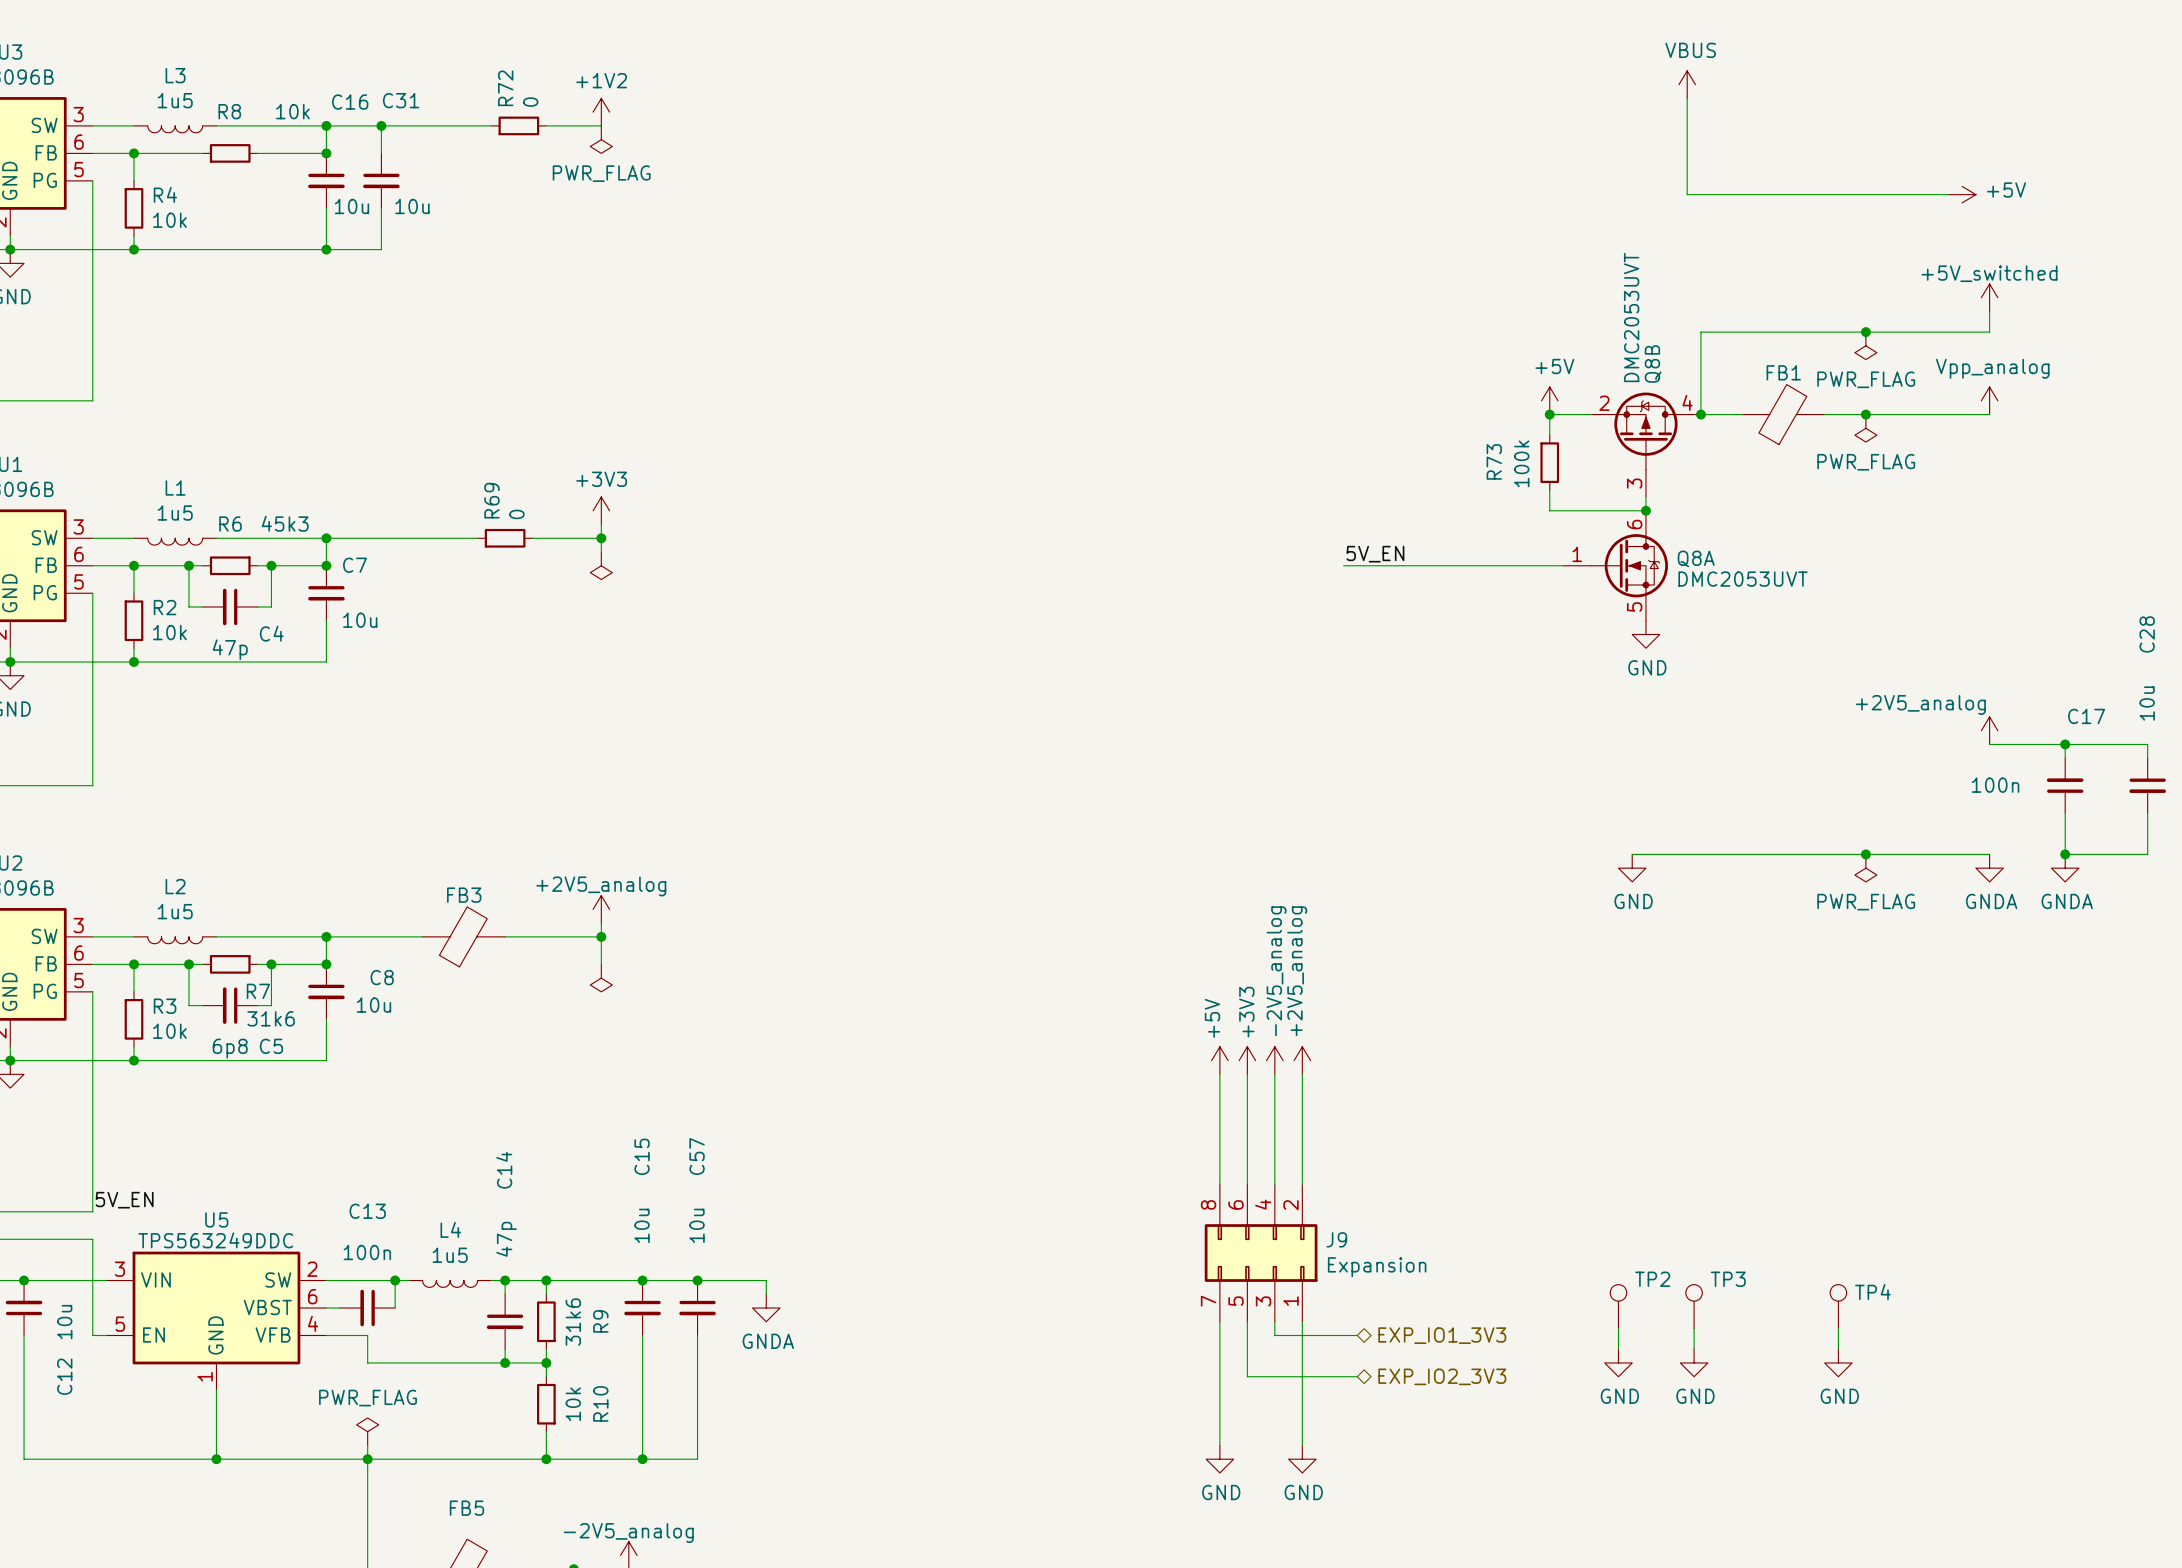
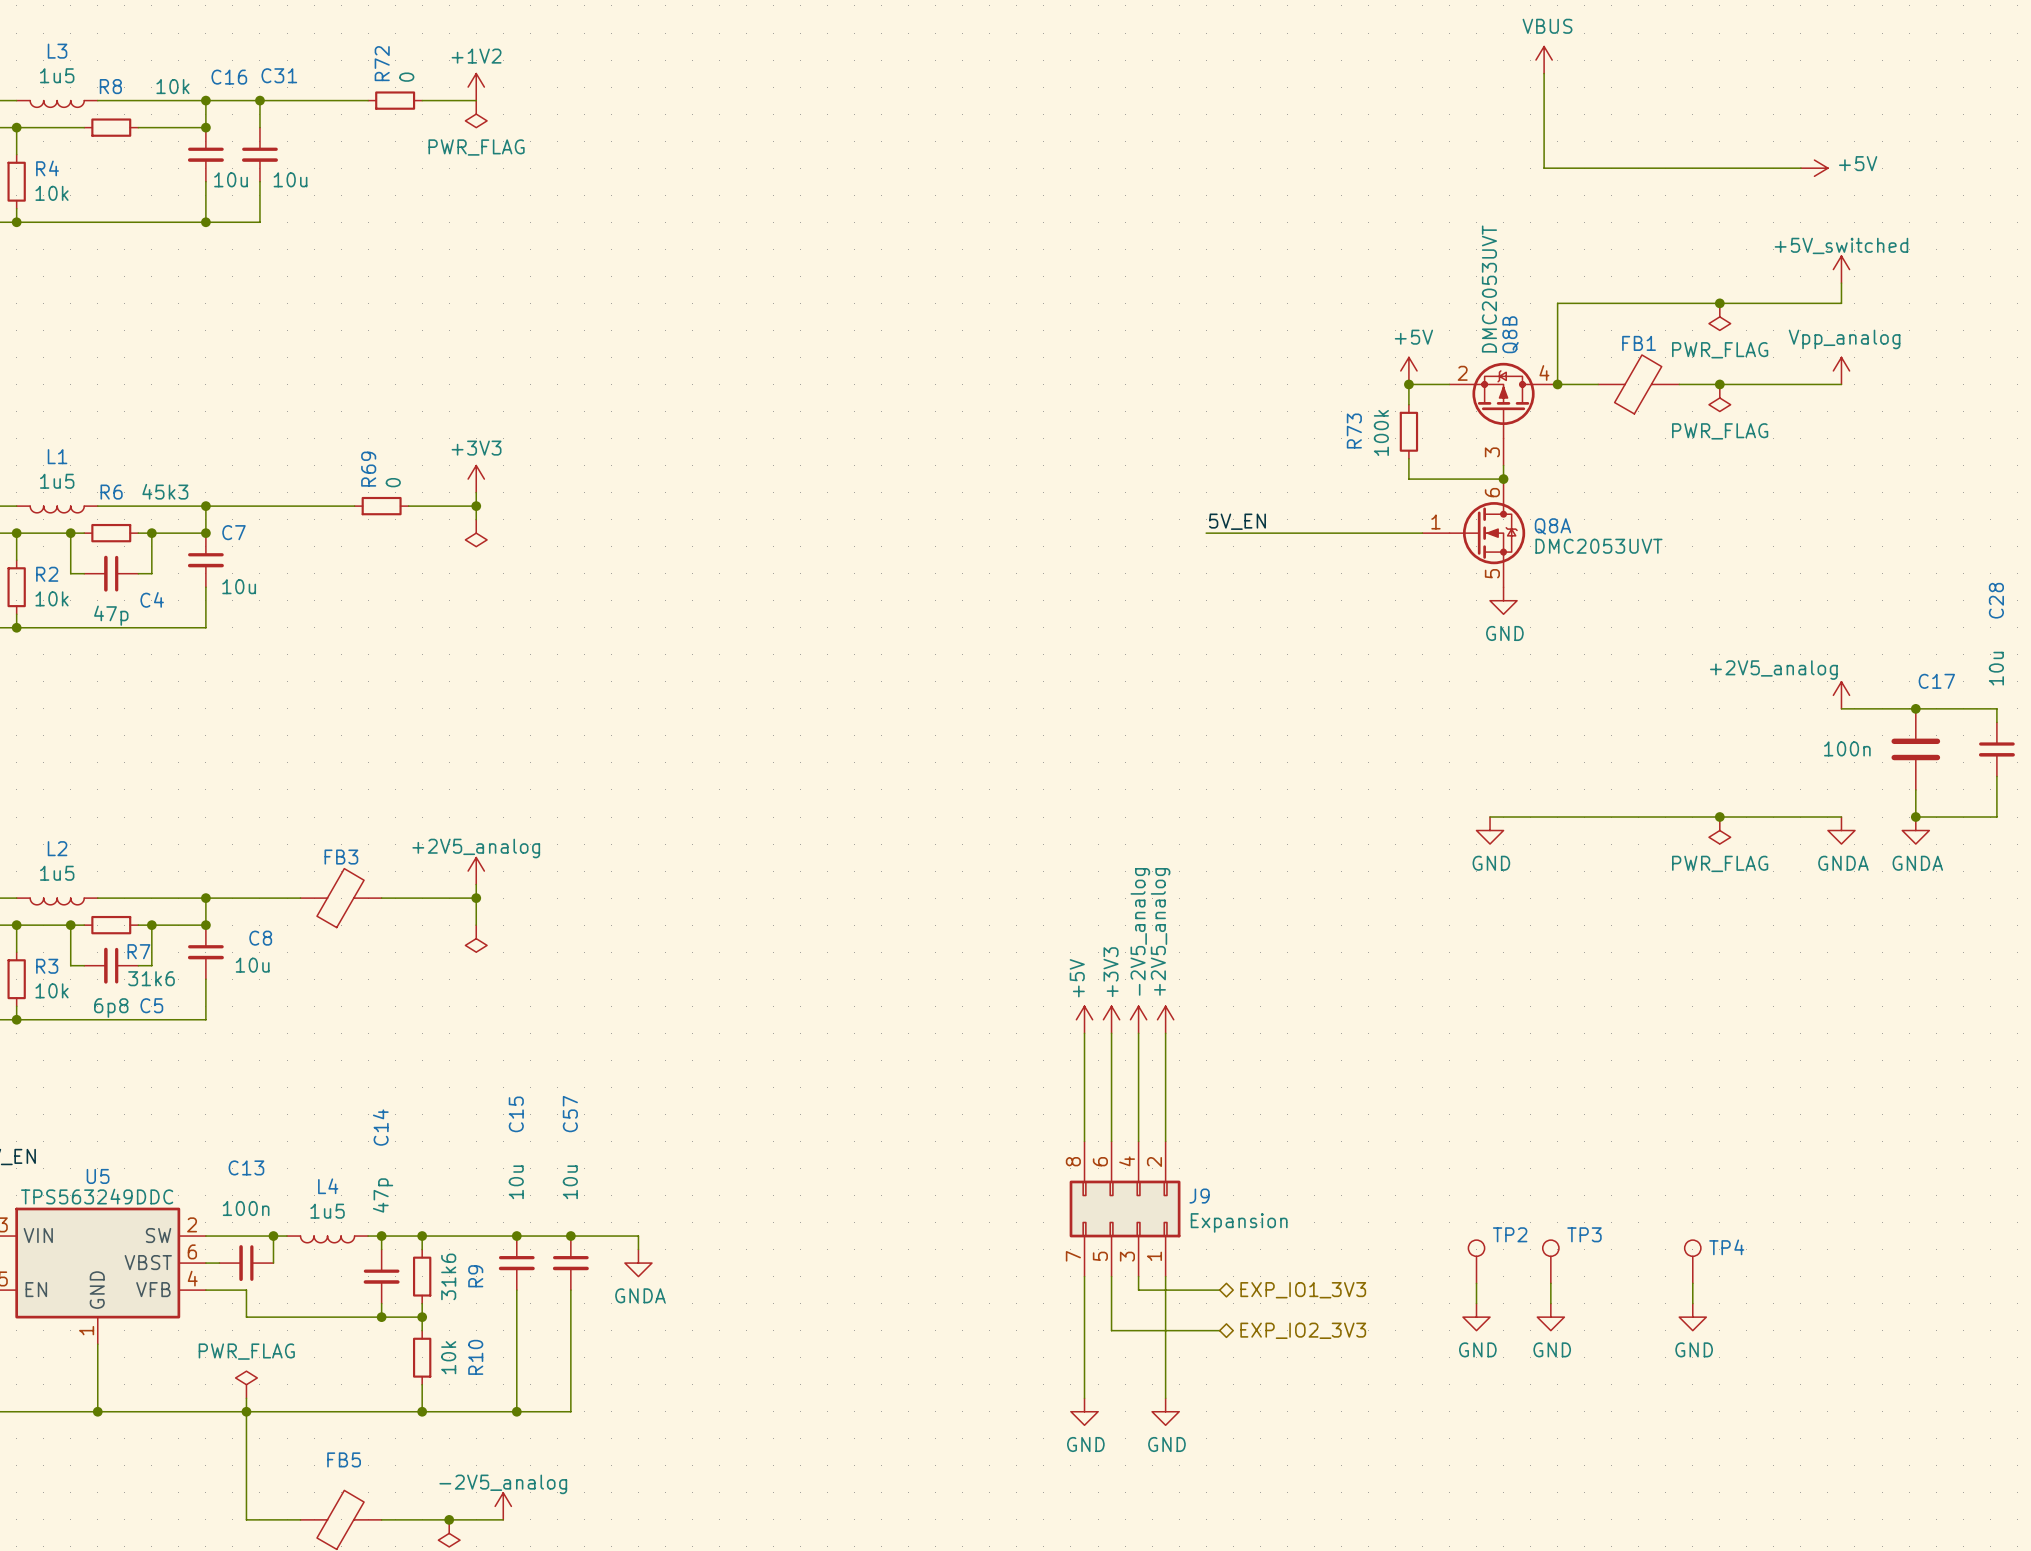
C17 symbol: [2046, 758, 2084, 814] -> [1891, 708, 1941, 790]

